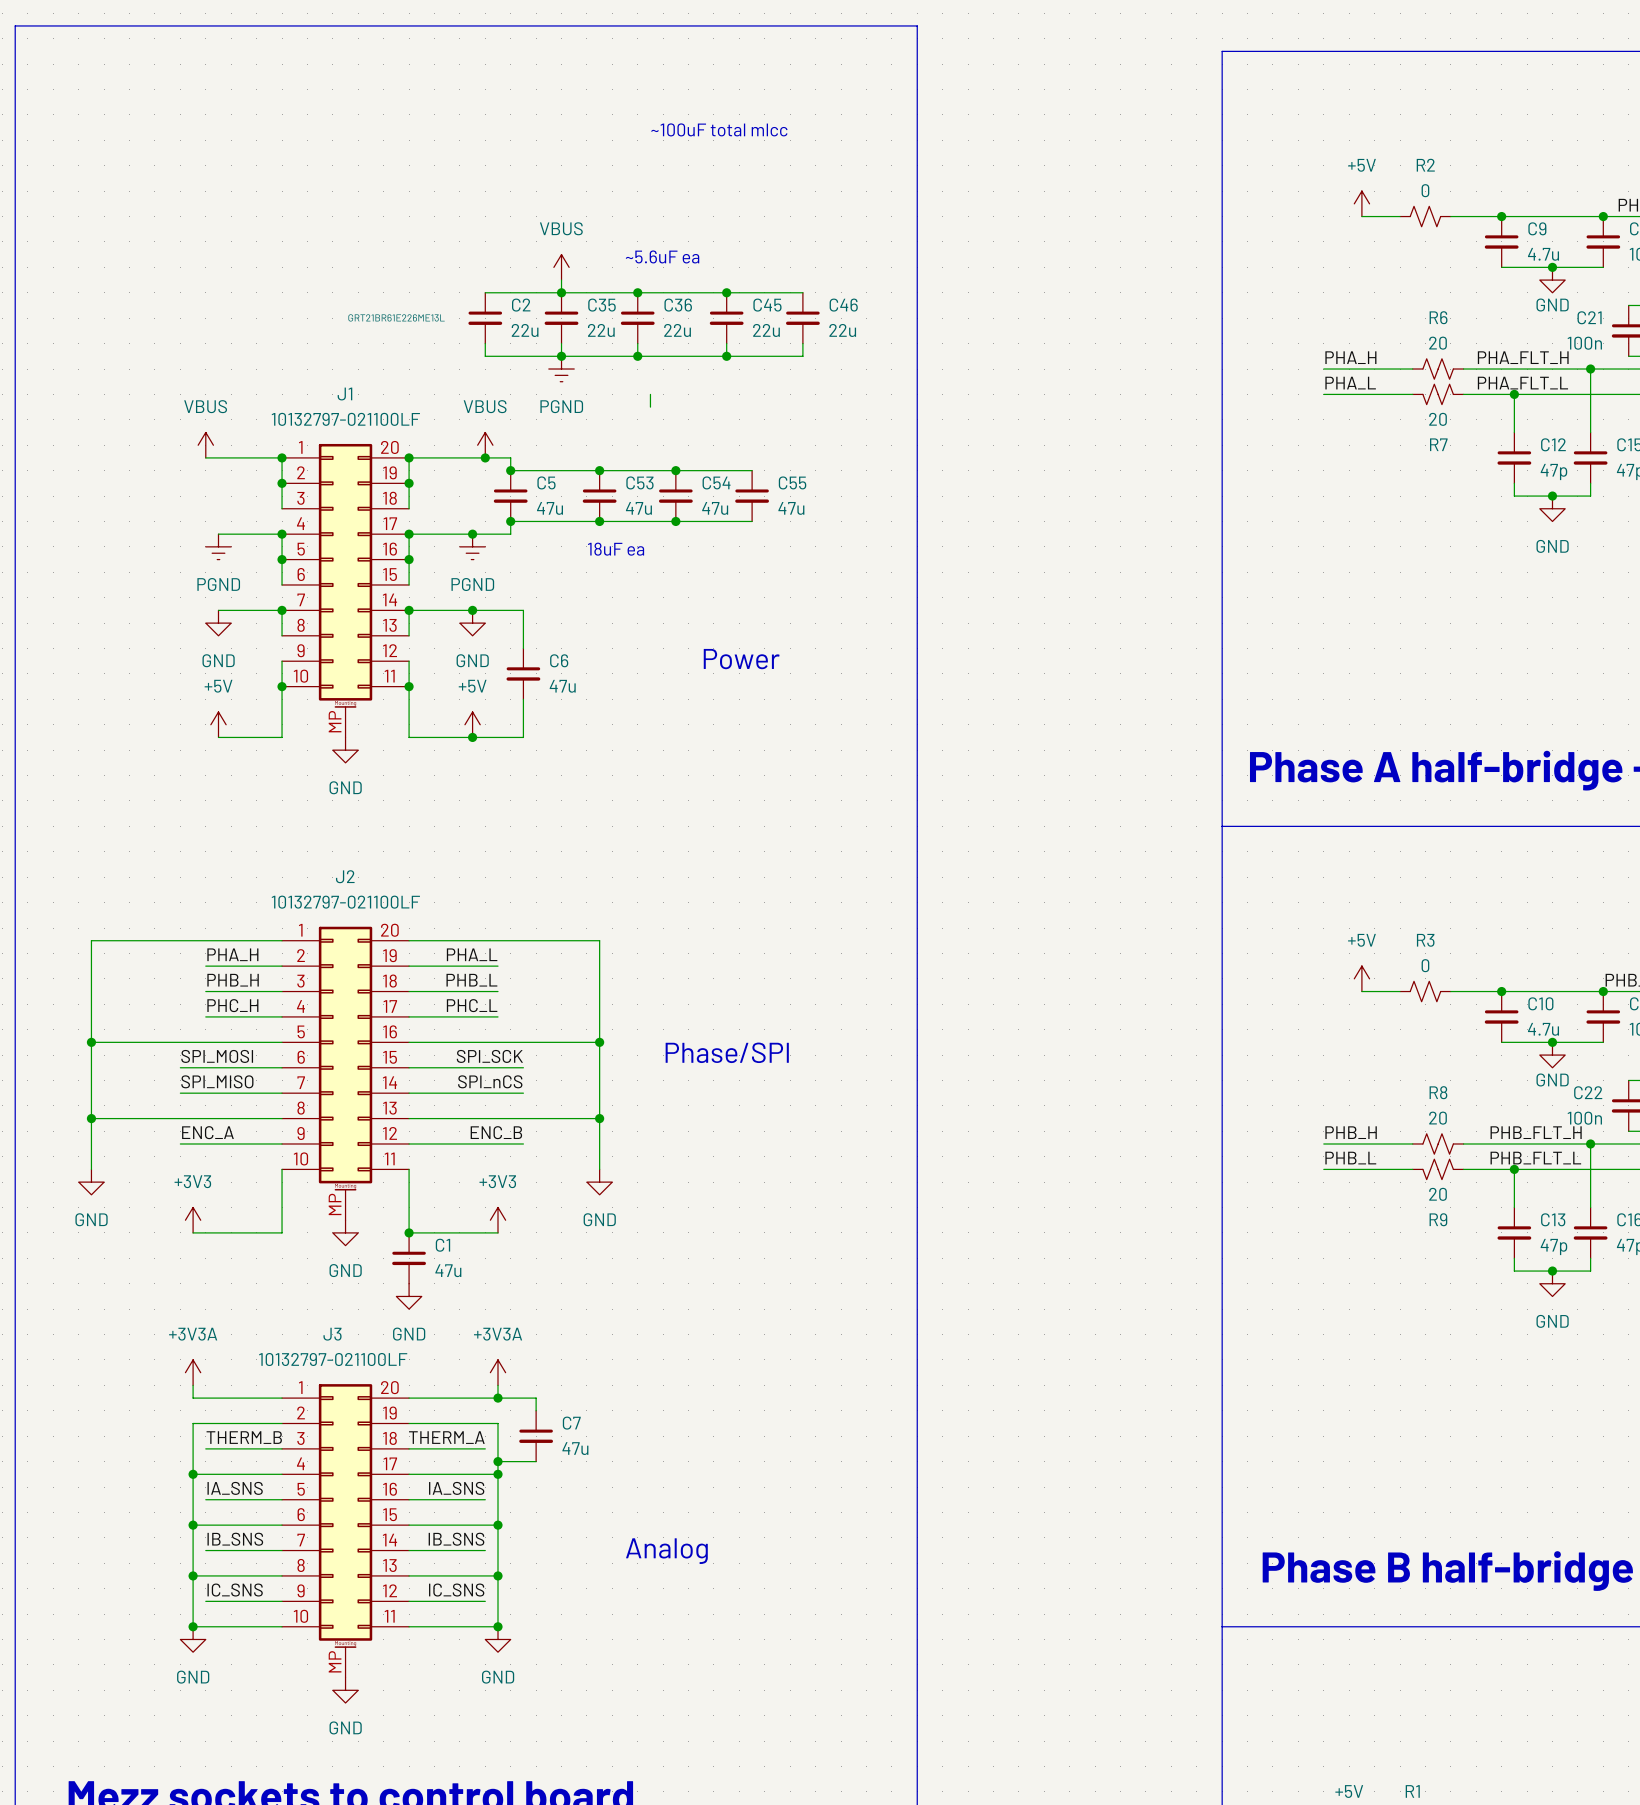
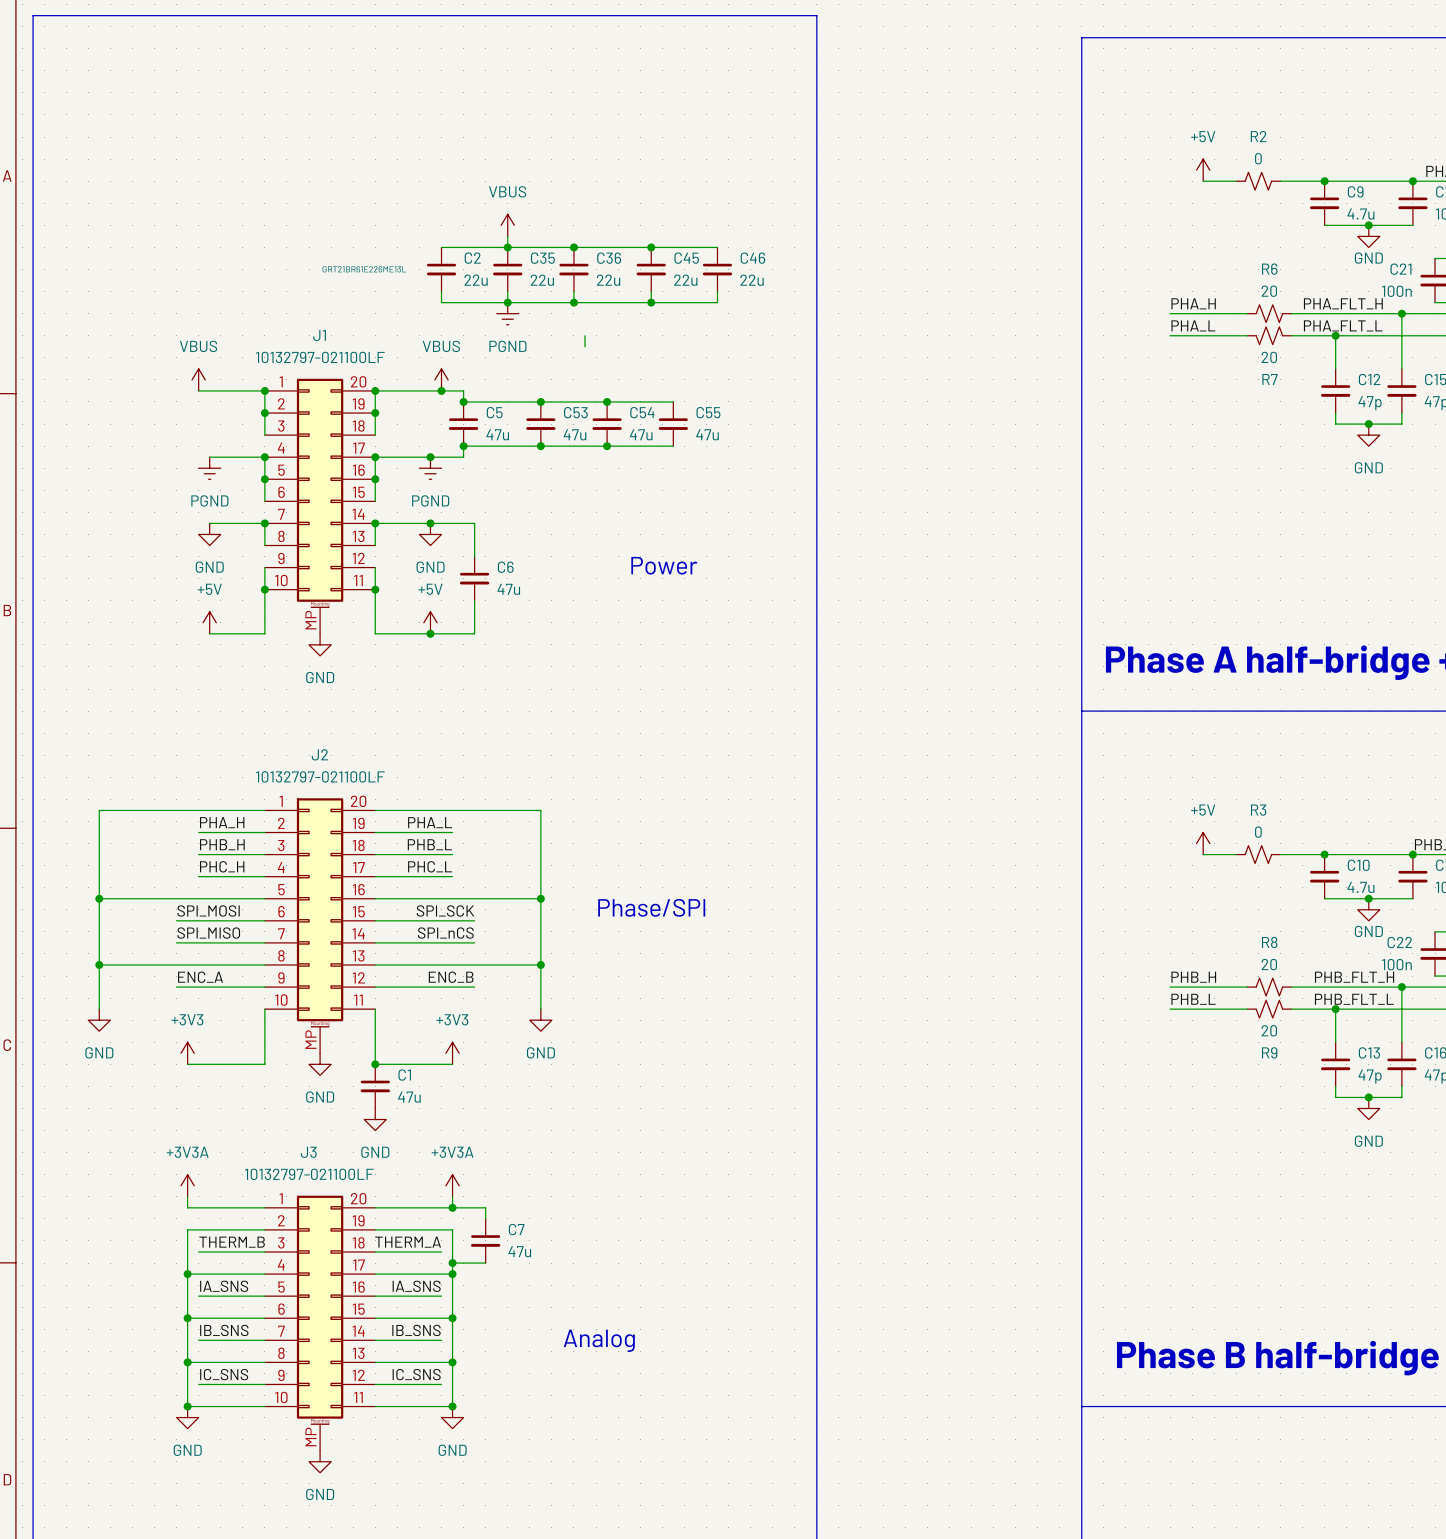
text: ~100uF total mlcc (719, 129) -> none
text: ~5.6uF ea (662, 256) -> none
text: 18uF ea (616, 549) -> none

